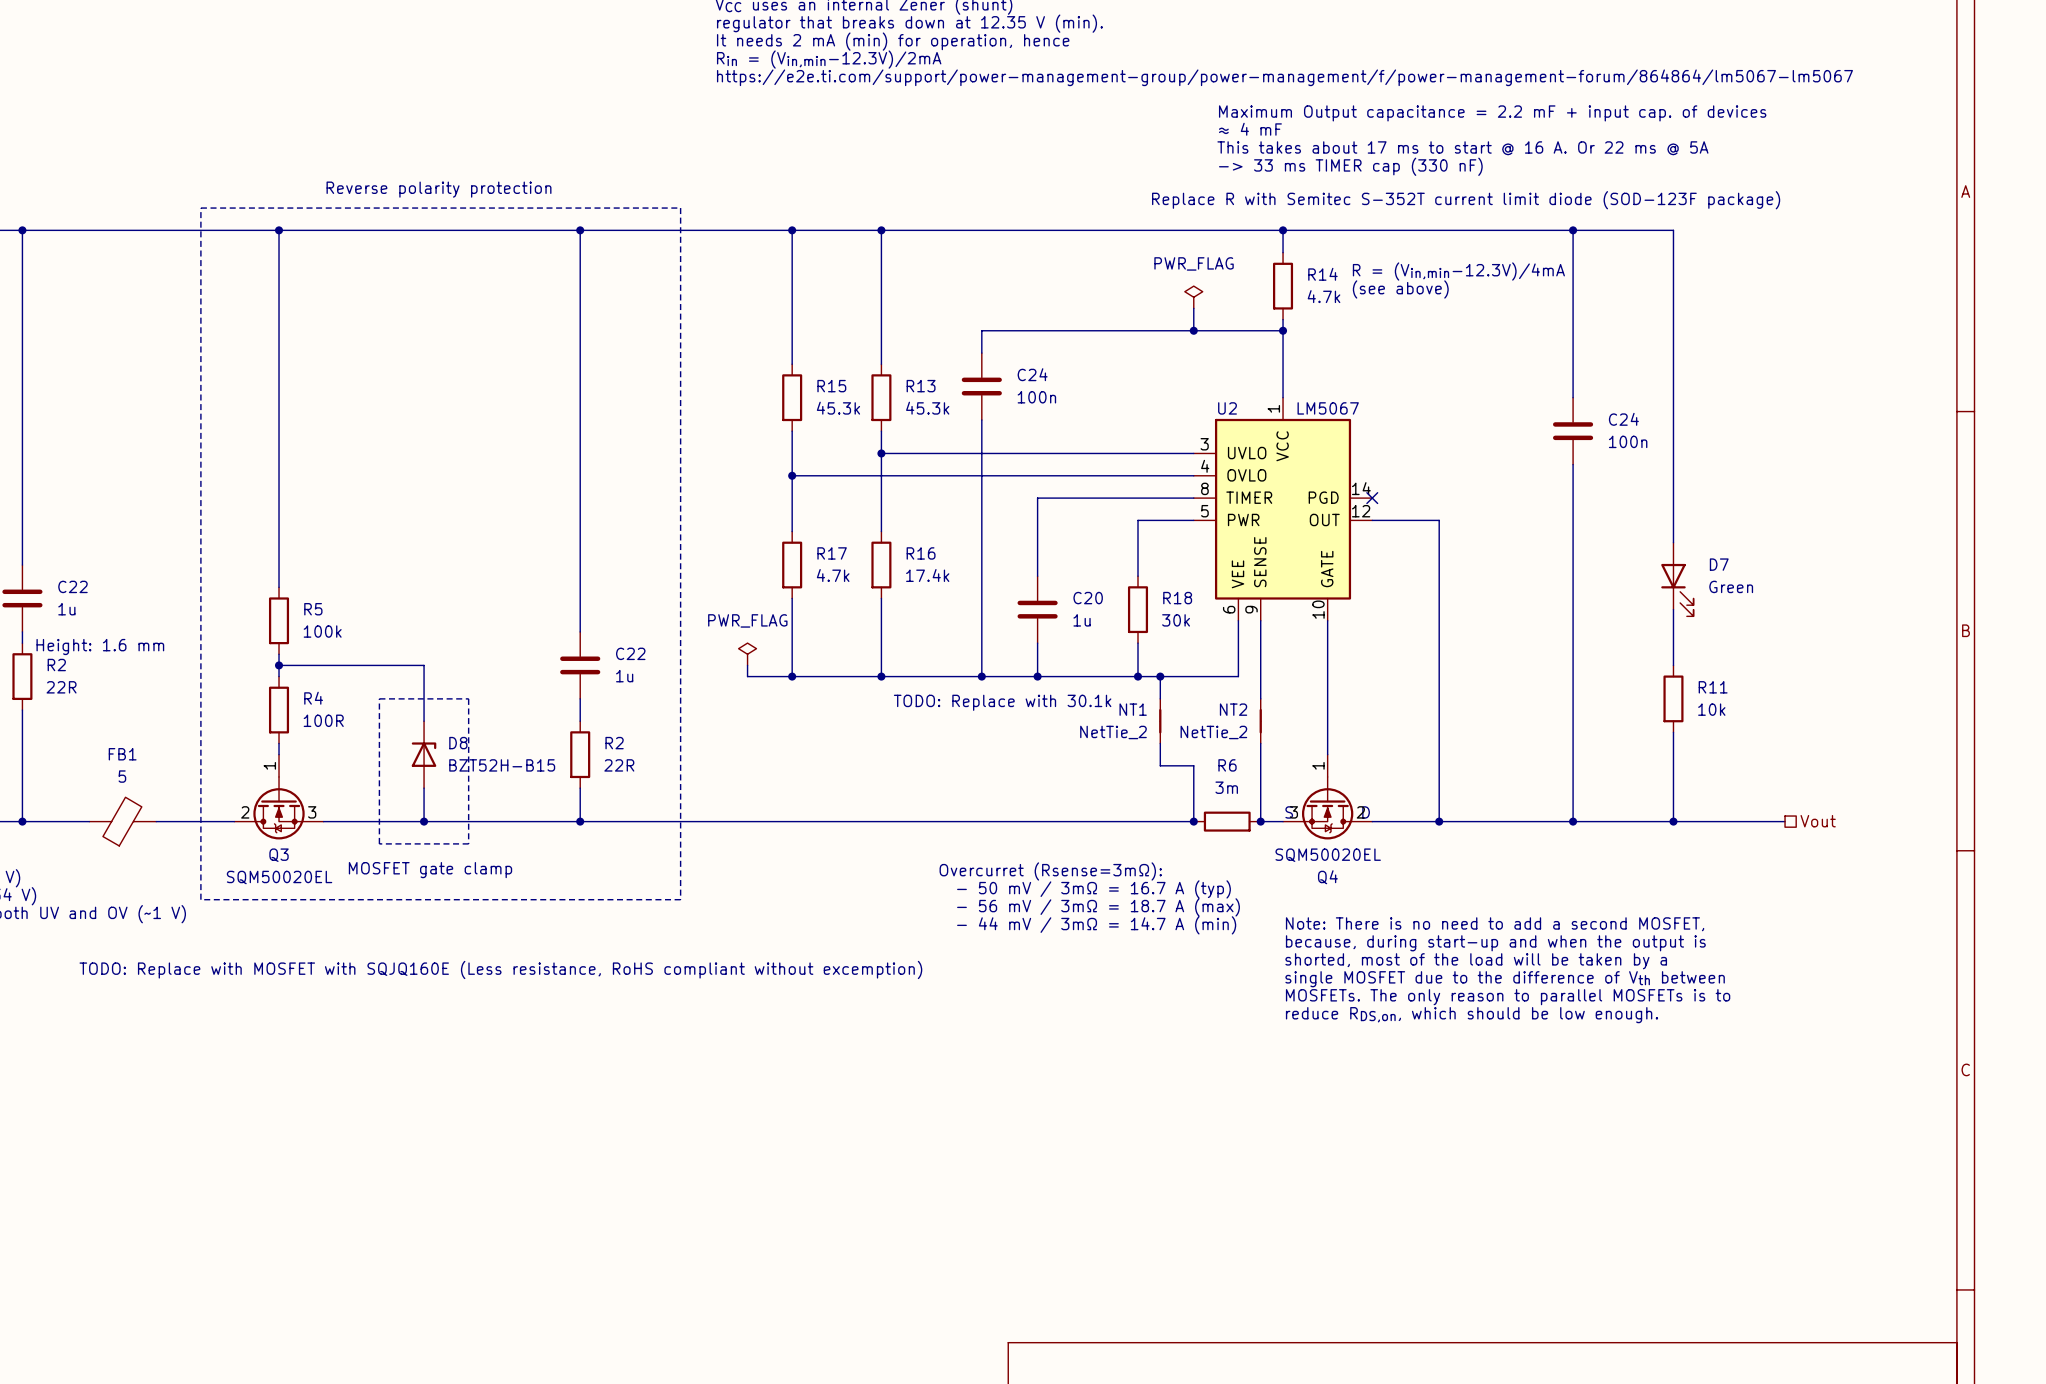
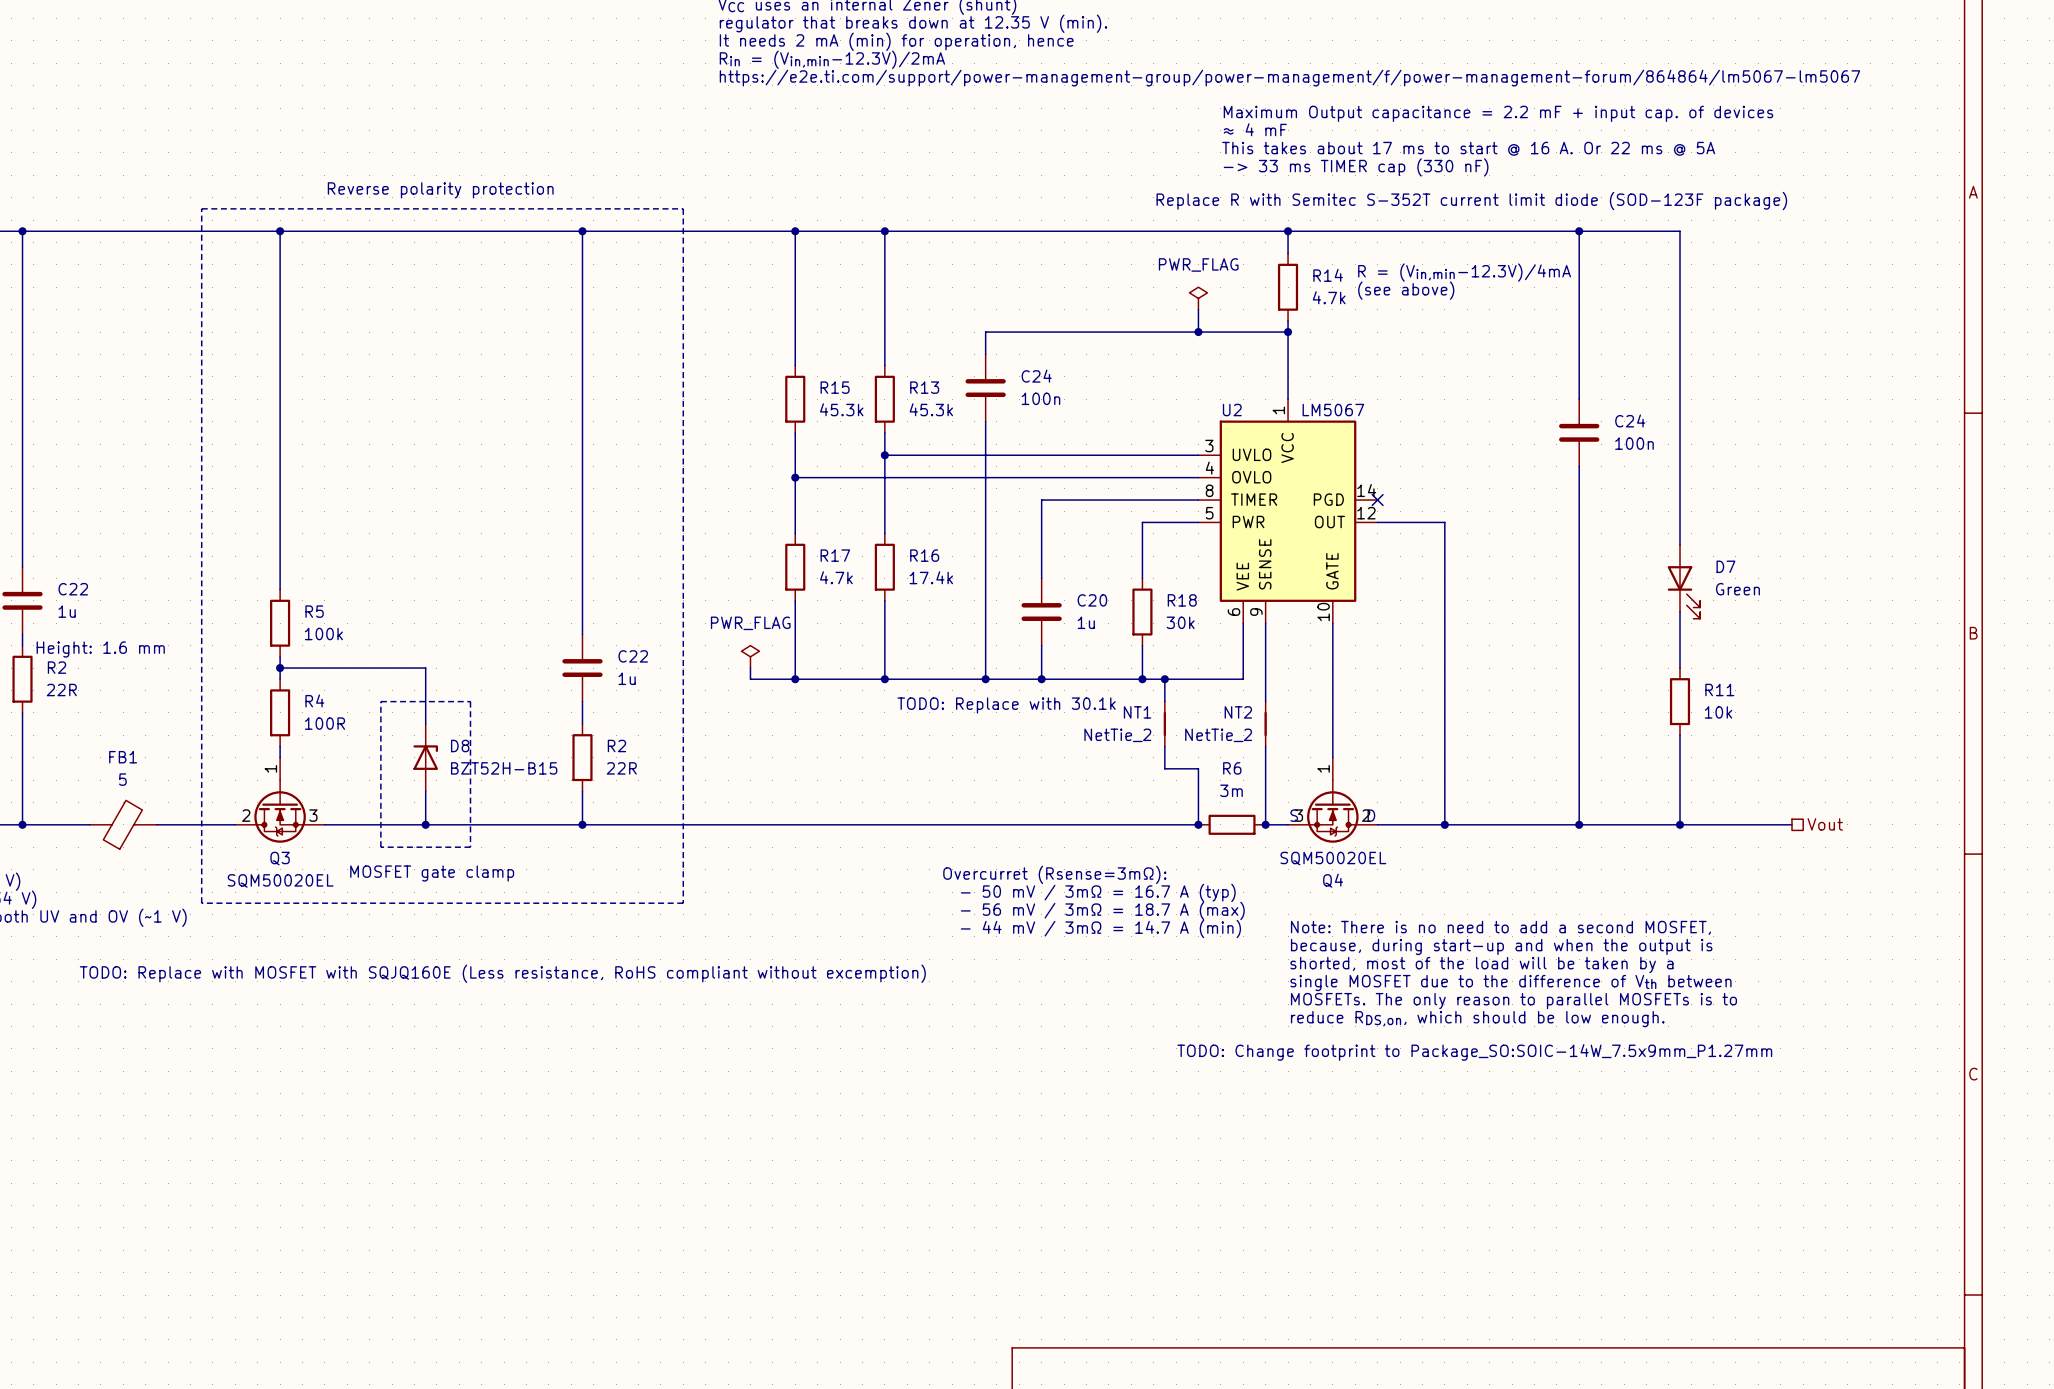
text: none -> TODO: Change footprint to Package_SO:SOIC-14W_7.5x9mm_P1.27mm (1474, 1052)

